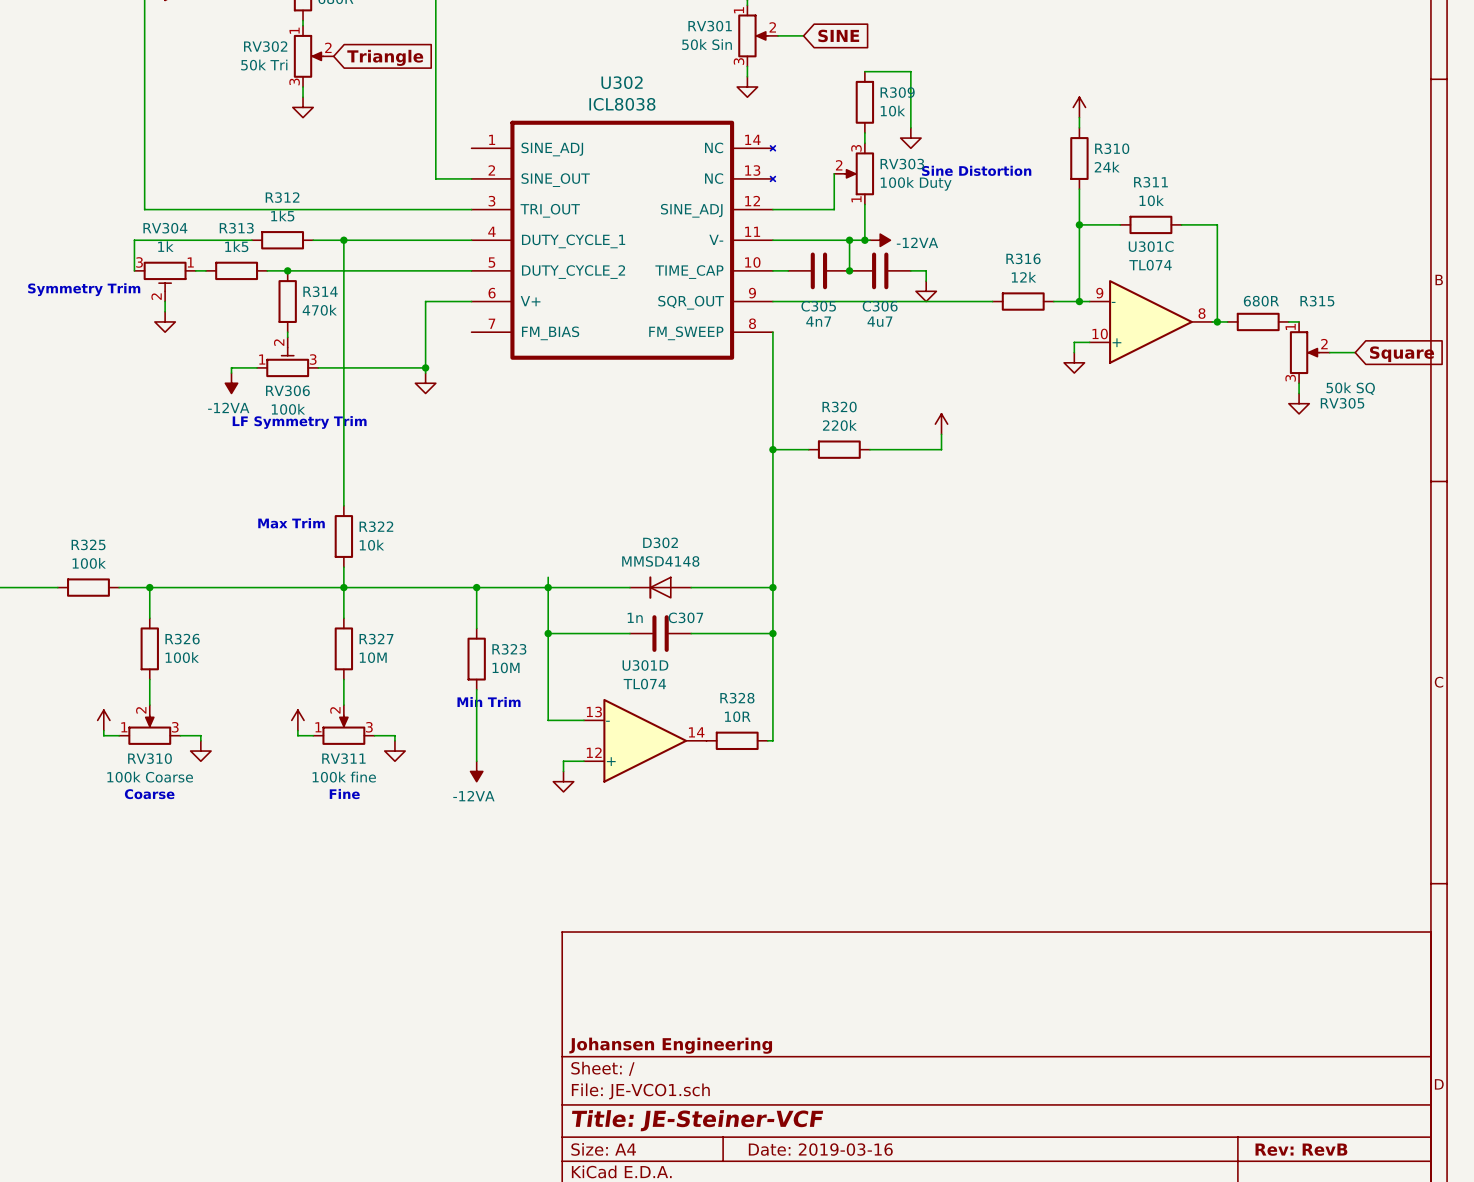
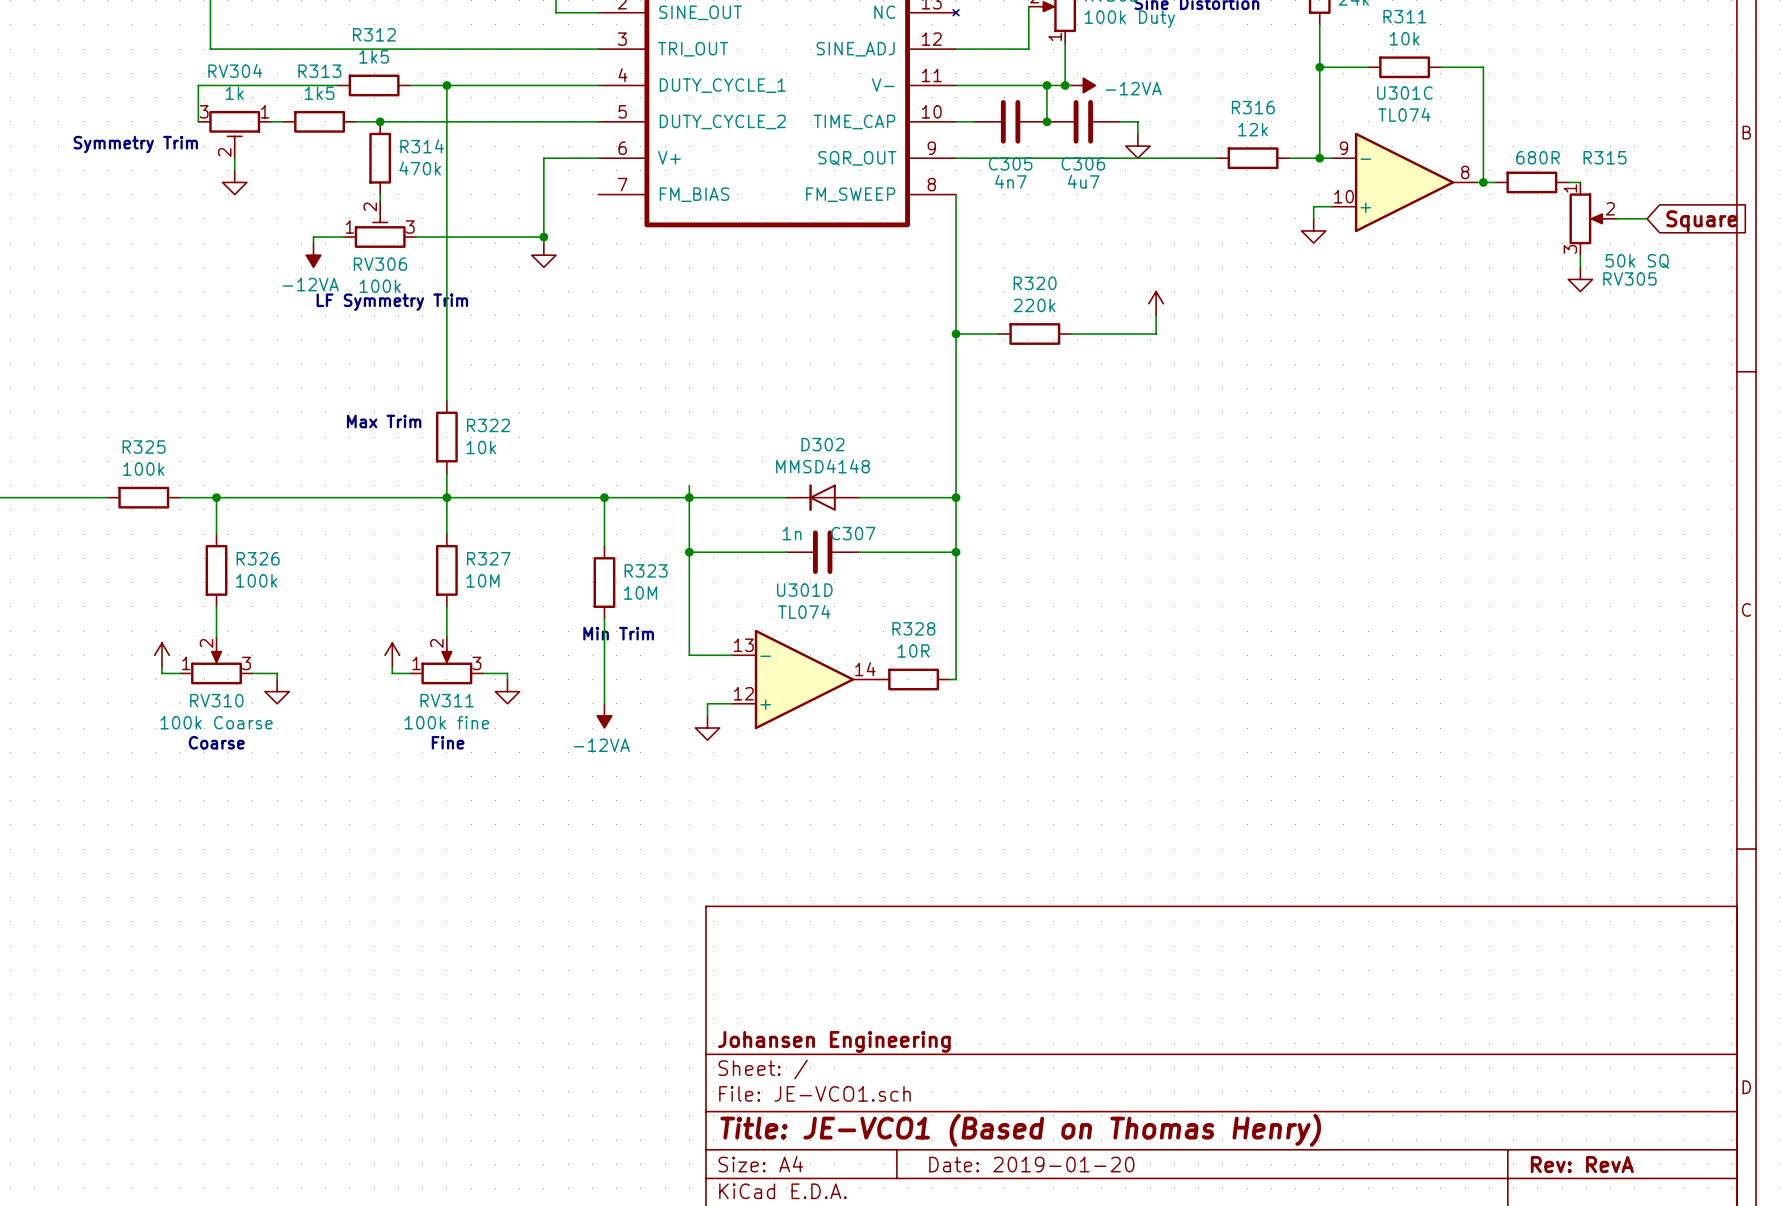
title block: Title: JE-Steiner-VCF (697, 1120) -> Title: JE-VCO1 (Based on Thomas Henry) (1020, 1130)
title block: Date: 2019-03-16 (820, 1149) -> Date: 2019-01-20 (1031, 1164)
title block: Rev: RevB (1301, 1149) -> Rev: RevA (1582, 1164)

